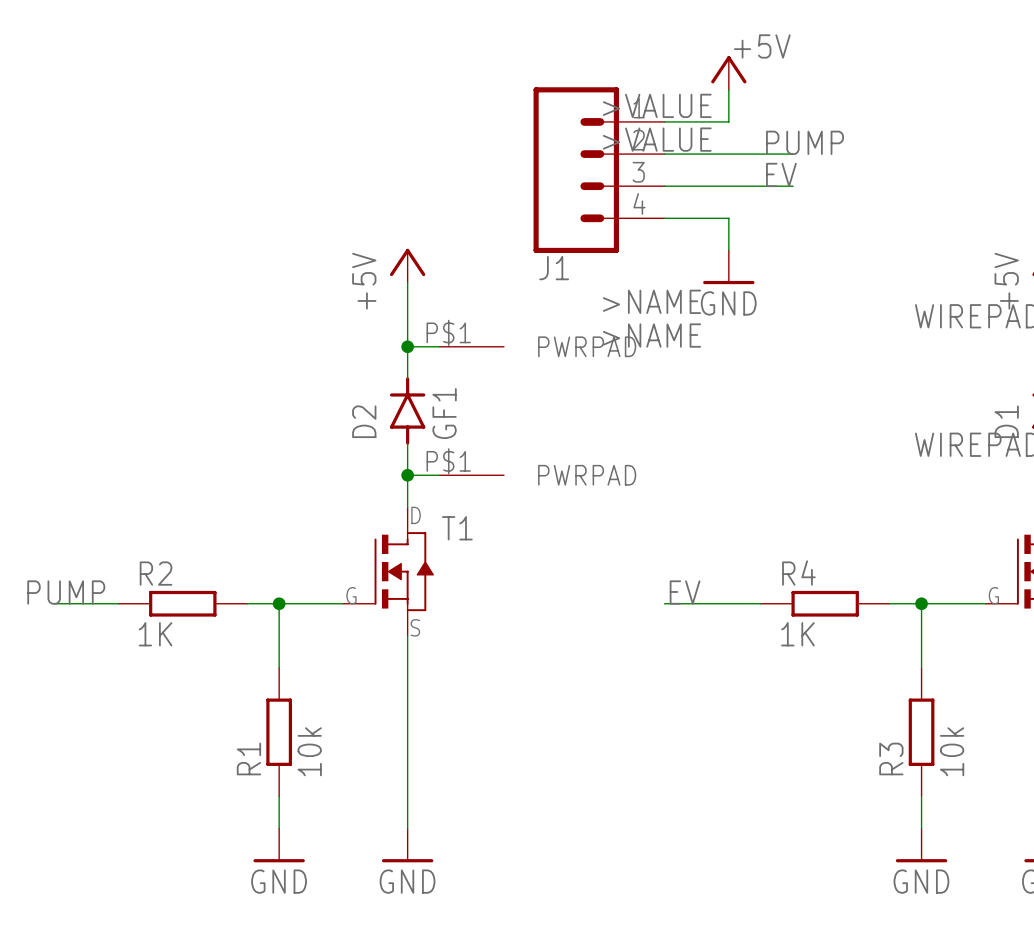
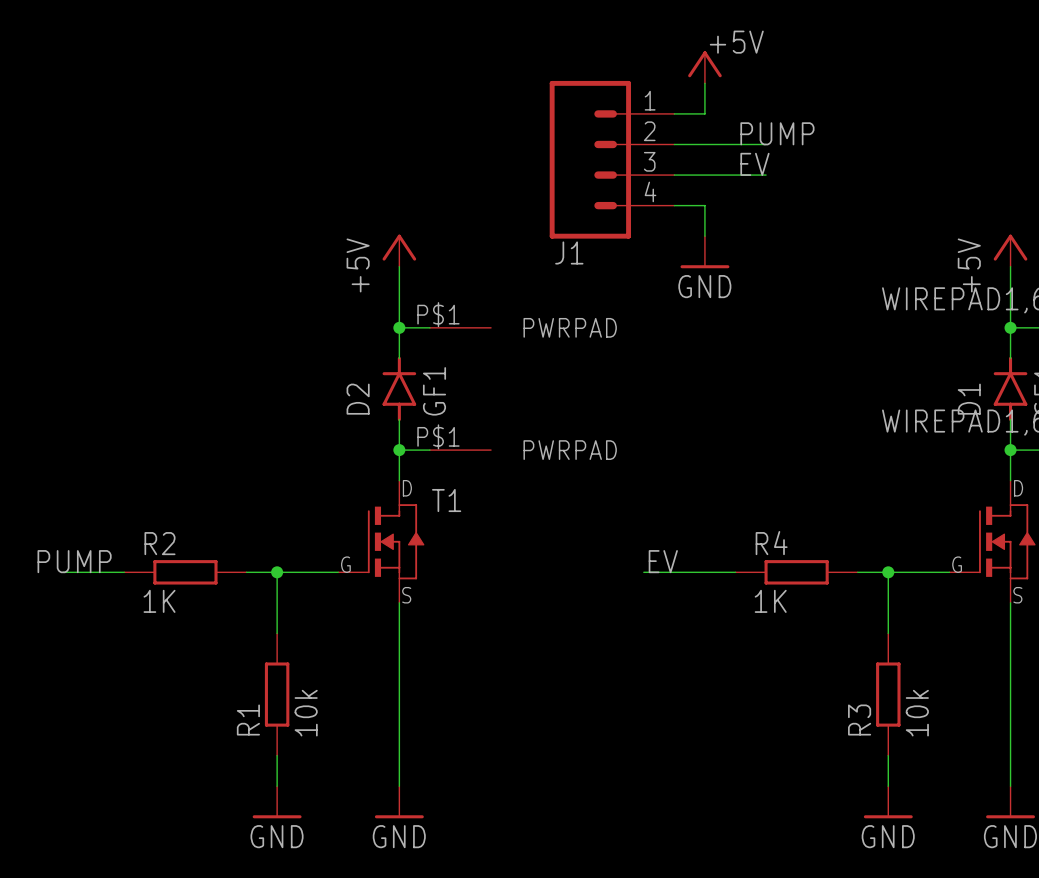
J1 text: >VALUE (657, 105) -> none
J1 text: >VALUE (657, 139) -> none
J1 position: (599, 170) -> (612, 159)
J1 text: >NAME (651, 301) -> none
J1 text: >NAME (651, 335) -> none

